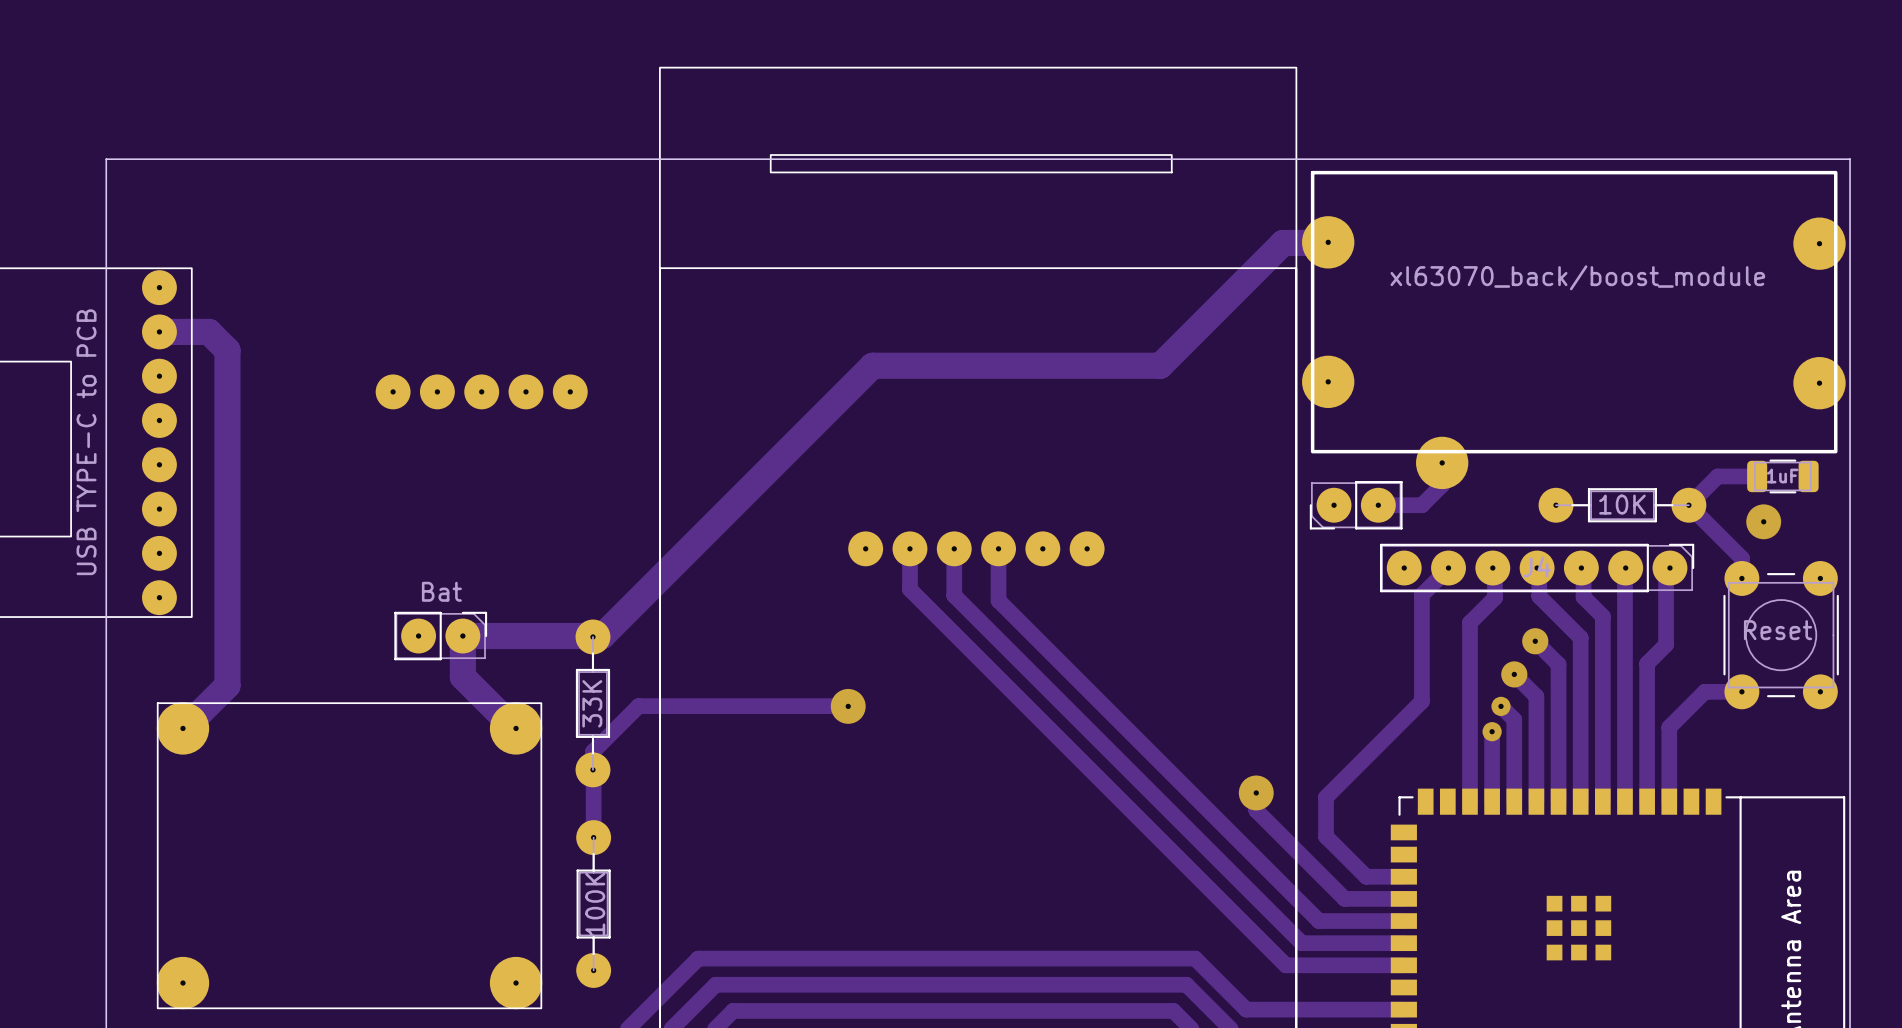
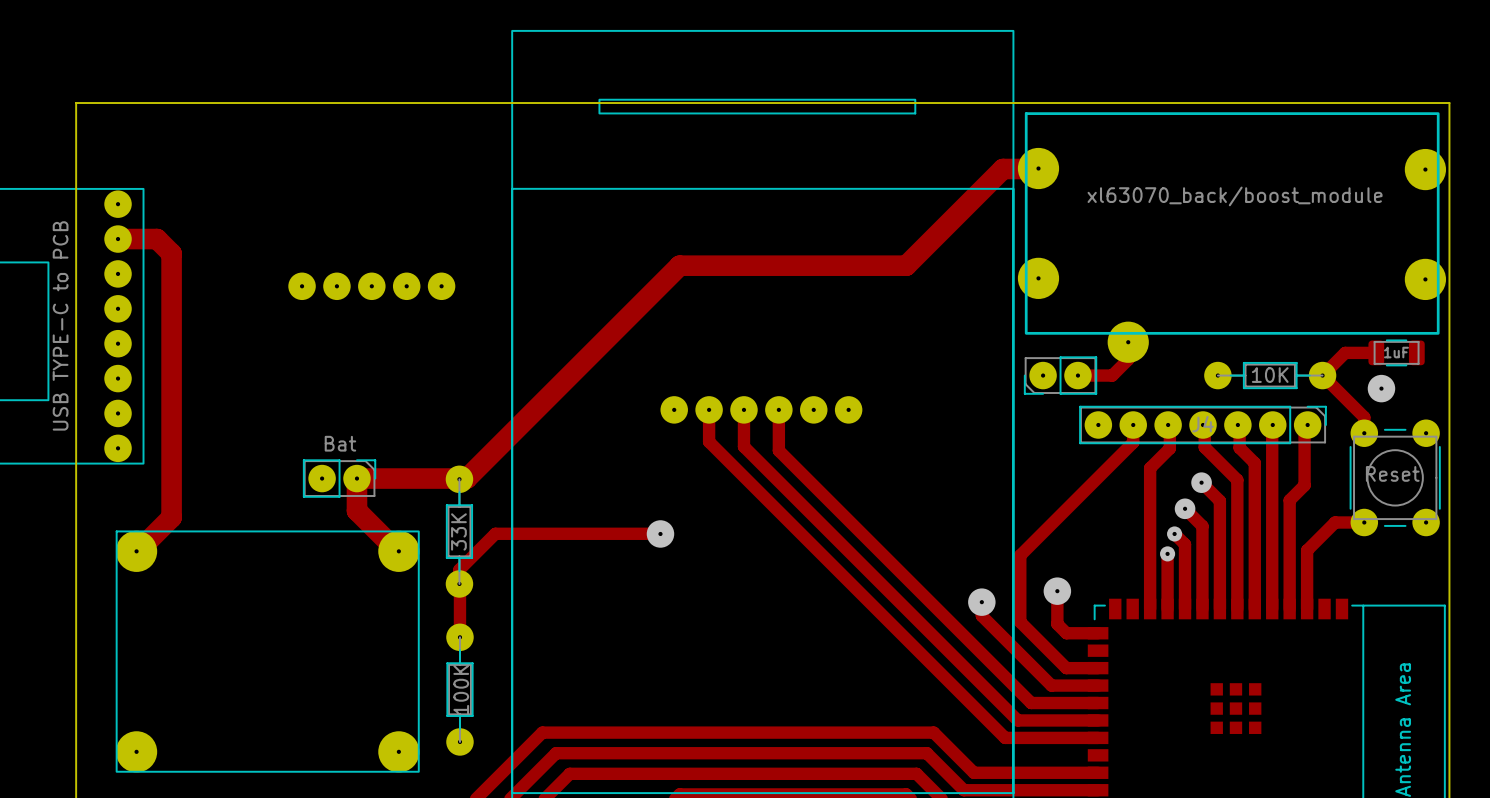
track: (1450, 566) (1421, 595) (1421, 701) (1326, 797) (1326, 836) (1366, 876) -> (1134, 423) (1133, 424) (1133, 442) (1020, 555) (1020, 622) (1068, 668)
track: none -> (1057, 591) (1057, 624) (1066, 633) (1098, 633)
via: none -> (1057, 591)

